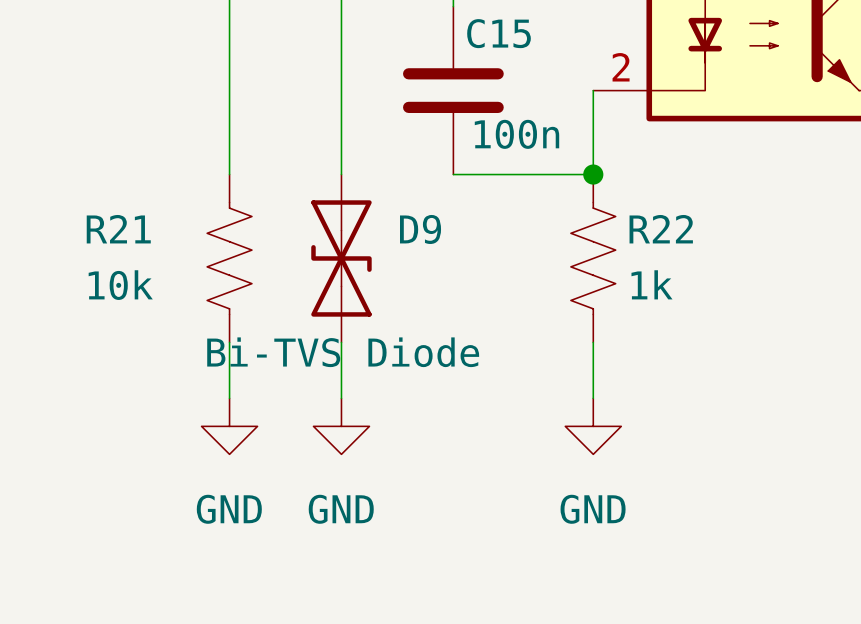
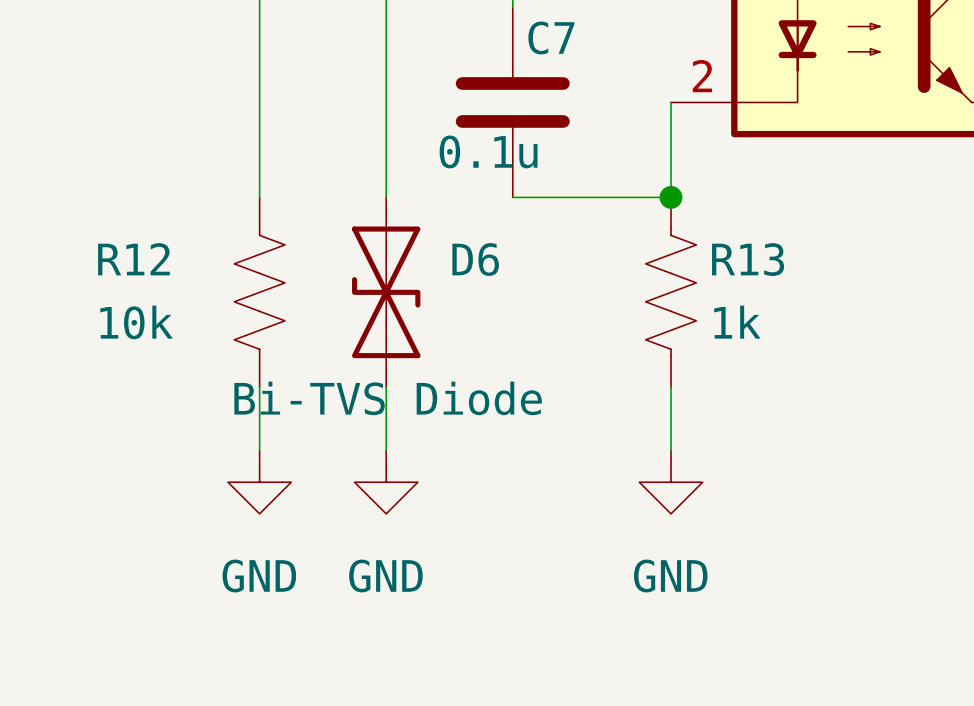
C15 name: C15 (499, 33) -> C7 (551, 38)
C15 value: 100n (516, 134) -> 0.1u (488, 151)
R21 name: R21 (118, 229) -> R12 (133, 259)
D9 name: D9 (420, 229) -> D6 (475, 259)
R22 name: R22 (661, 229) -> R13 (748, 259)

